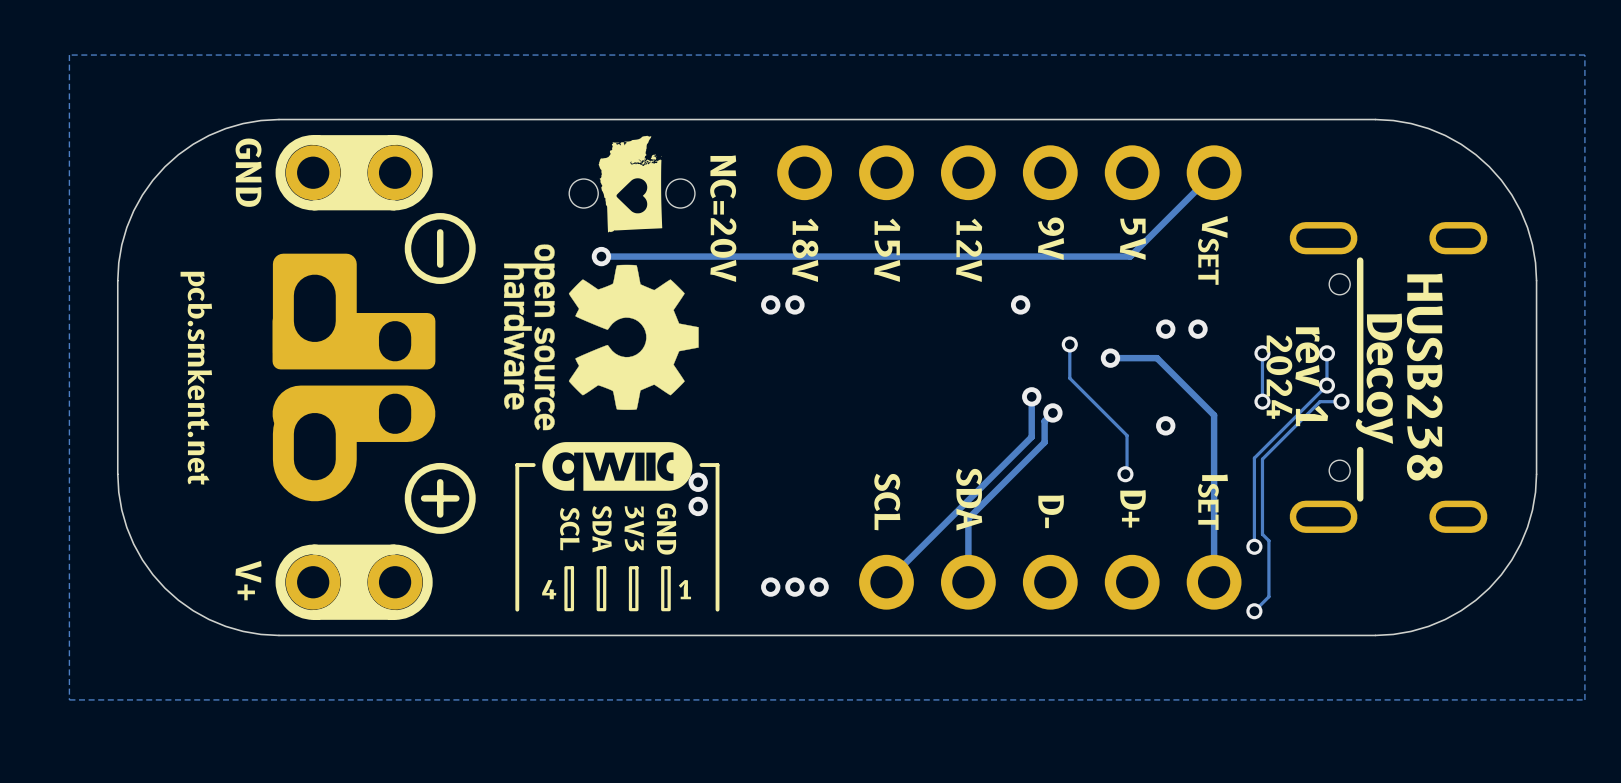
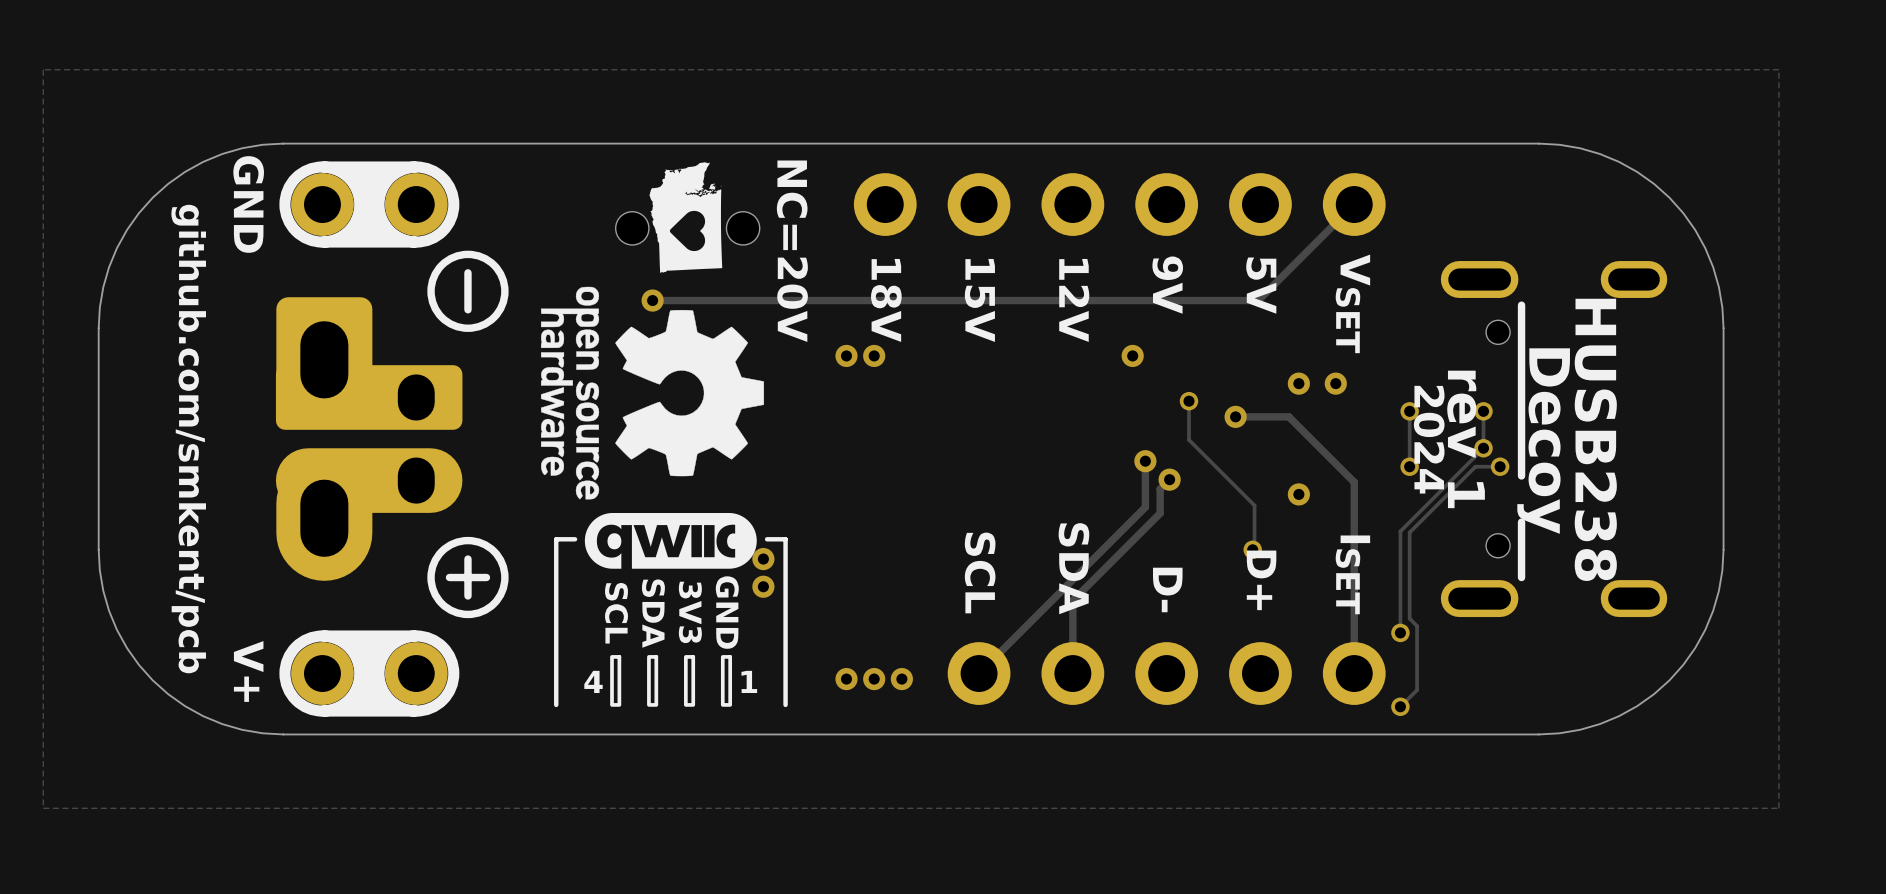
text: pcb.smkent.net (196, 378) -> github.com/smkent/pcb (188, 439)

